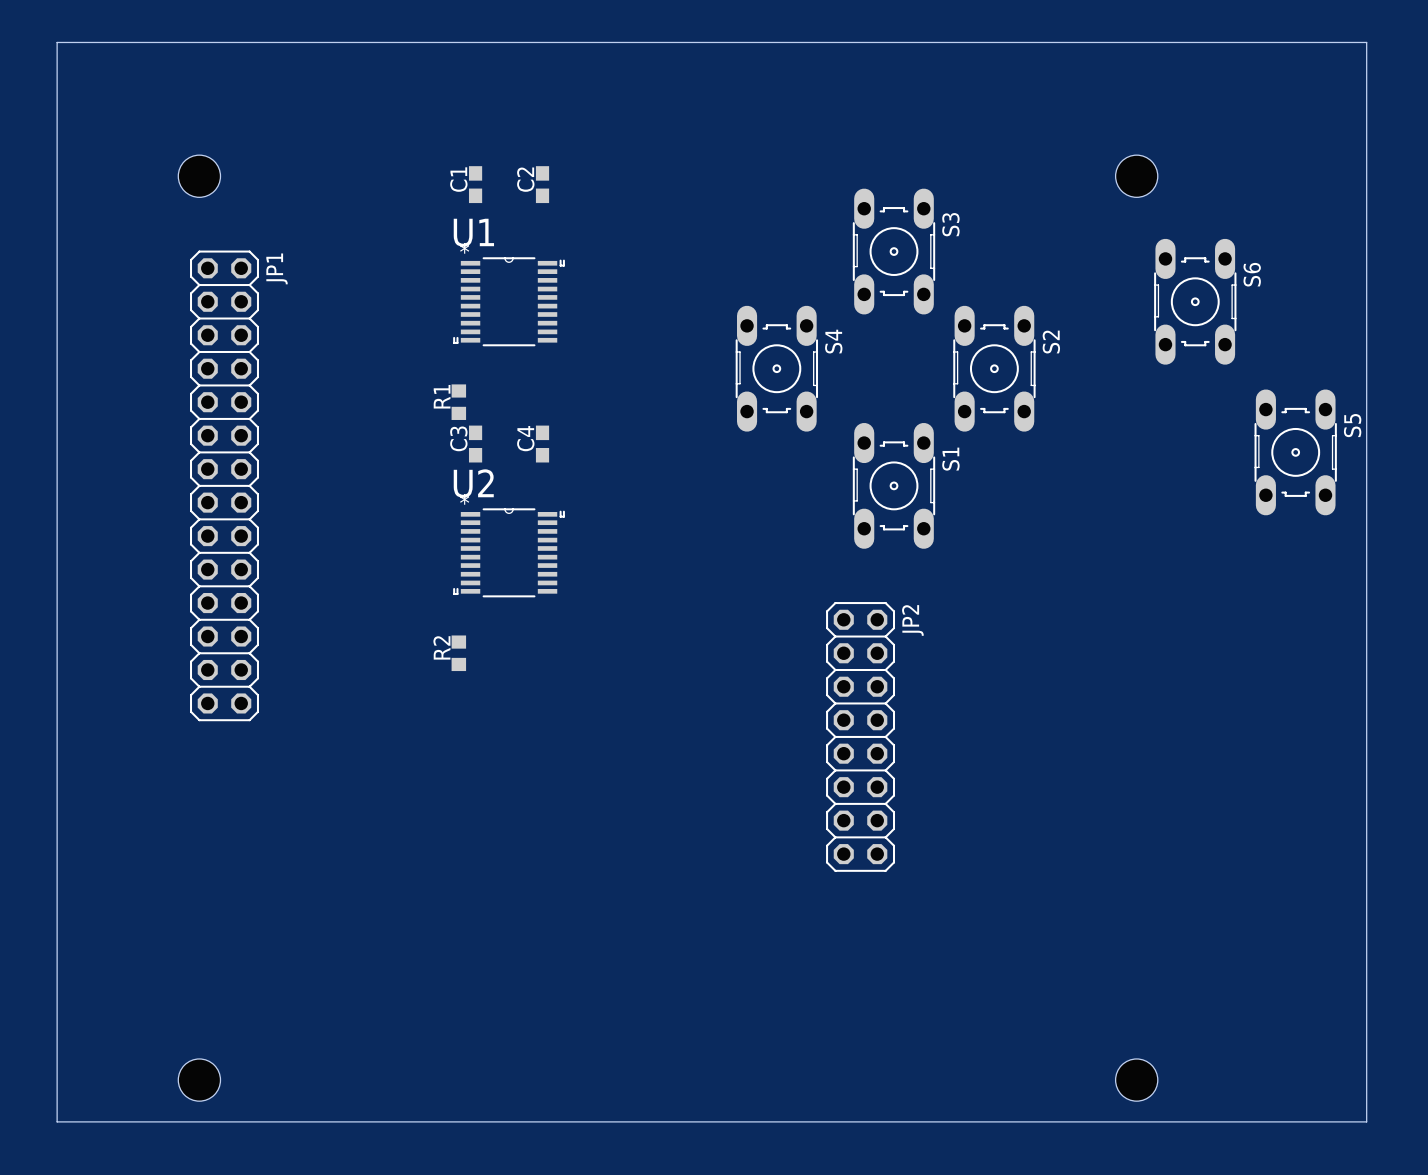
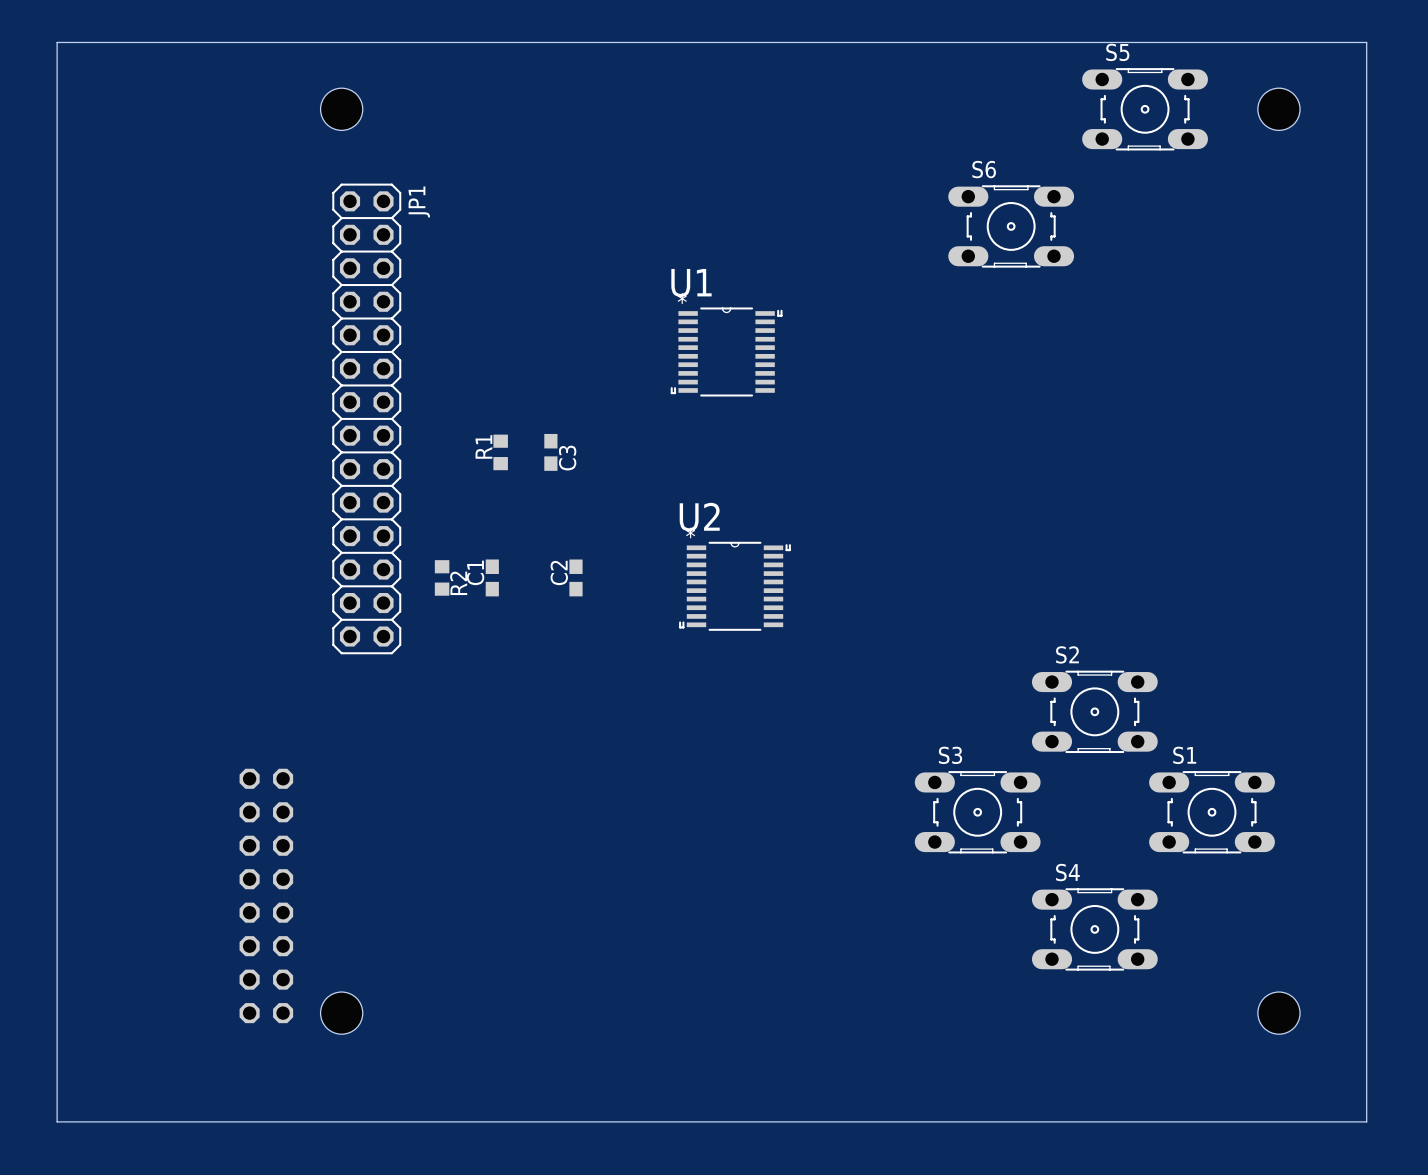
hole position: (199, 176) -> (341, 109)
hole position: (1136, 176) -> (1278, 109)
C1 position: (475, 184) -> (492, 577)
C2 position: (542, 184) -> (575, 577)
S3 rotation: 0° (894, 251) -> 90° counterclockwise (977, 812)
S3 position: (894, 251) -> (977, 812)
U1 position: (509, 301) -> (726, 351)
S6 rotation: 0° (1195, 301) -> 90° counterclockwise (1011, 226)
S6 position: (1195, 301) -> (1011, 226)
S4 rotation: 0° (776, 368) -> 90° counterclockwise (1094, 929)
S4 position: (776, 368) -> (1094, 929)
S2 rotation: 0° (994, 368) -> 90° counterclockwise (1094, 711)
S2 position: (994, 368) -> (1094, 711)
R1 position: (458, 402) -> (500, 452)
C3 name position: C3 (458, 438) -> C3 (567, 458)
C3 position: (475, 444) -> (550, 452)
C4: (542, 444) -> none
S5 rotation: 0° (1295, 452) -> 90° counterclockwise (1145, 109)
S5 position: (1295, 452) -> (1145, 109)
JP1 position: (224, 485) -> (366, 418)
S1 rotation: 0° (894, 485) -> 90° counterclockwise (1212, 812)
S1 position: (894, 485) -> (1212, 812)
U2 position: (509, 552) -> (734, 586)
R2 name position: R2 (441, 647) -> R2 (458, 583)
R2 position: (458, 653) -> (442, 577)
JP2: (860, 736) -> none
part: none -> (266, 895)
hole position: (199, 1080) -> (341, 1013)
hole position: (1136, 1080) -> (1278, 1013)

